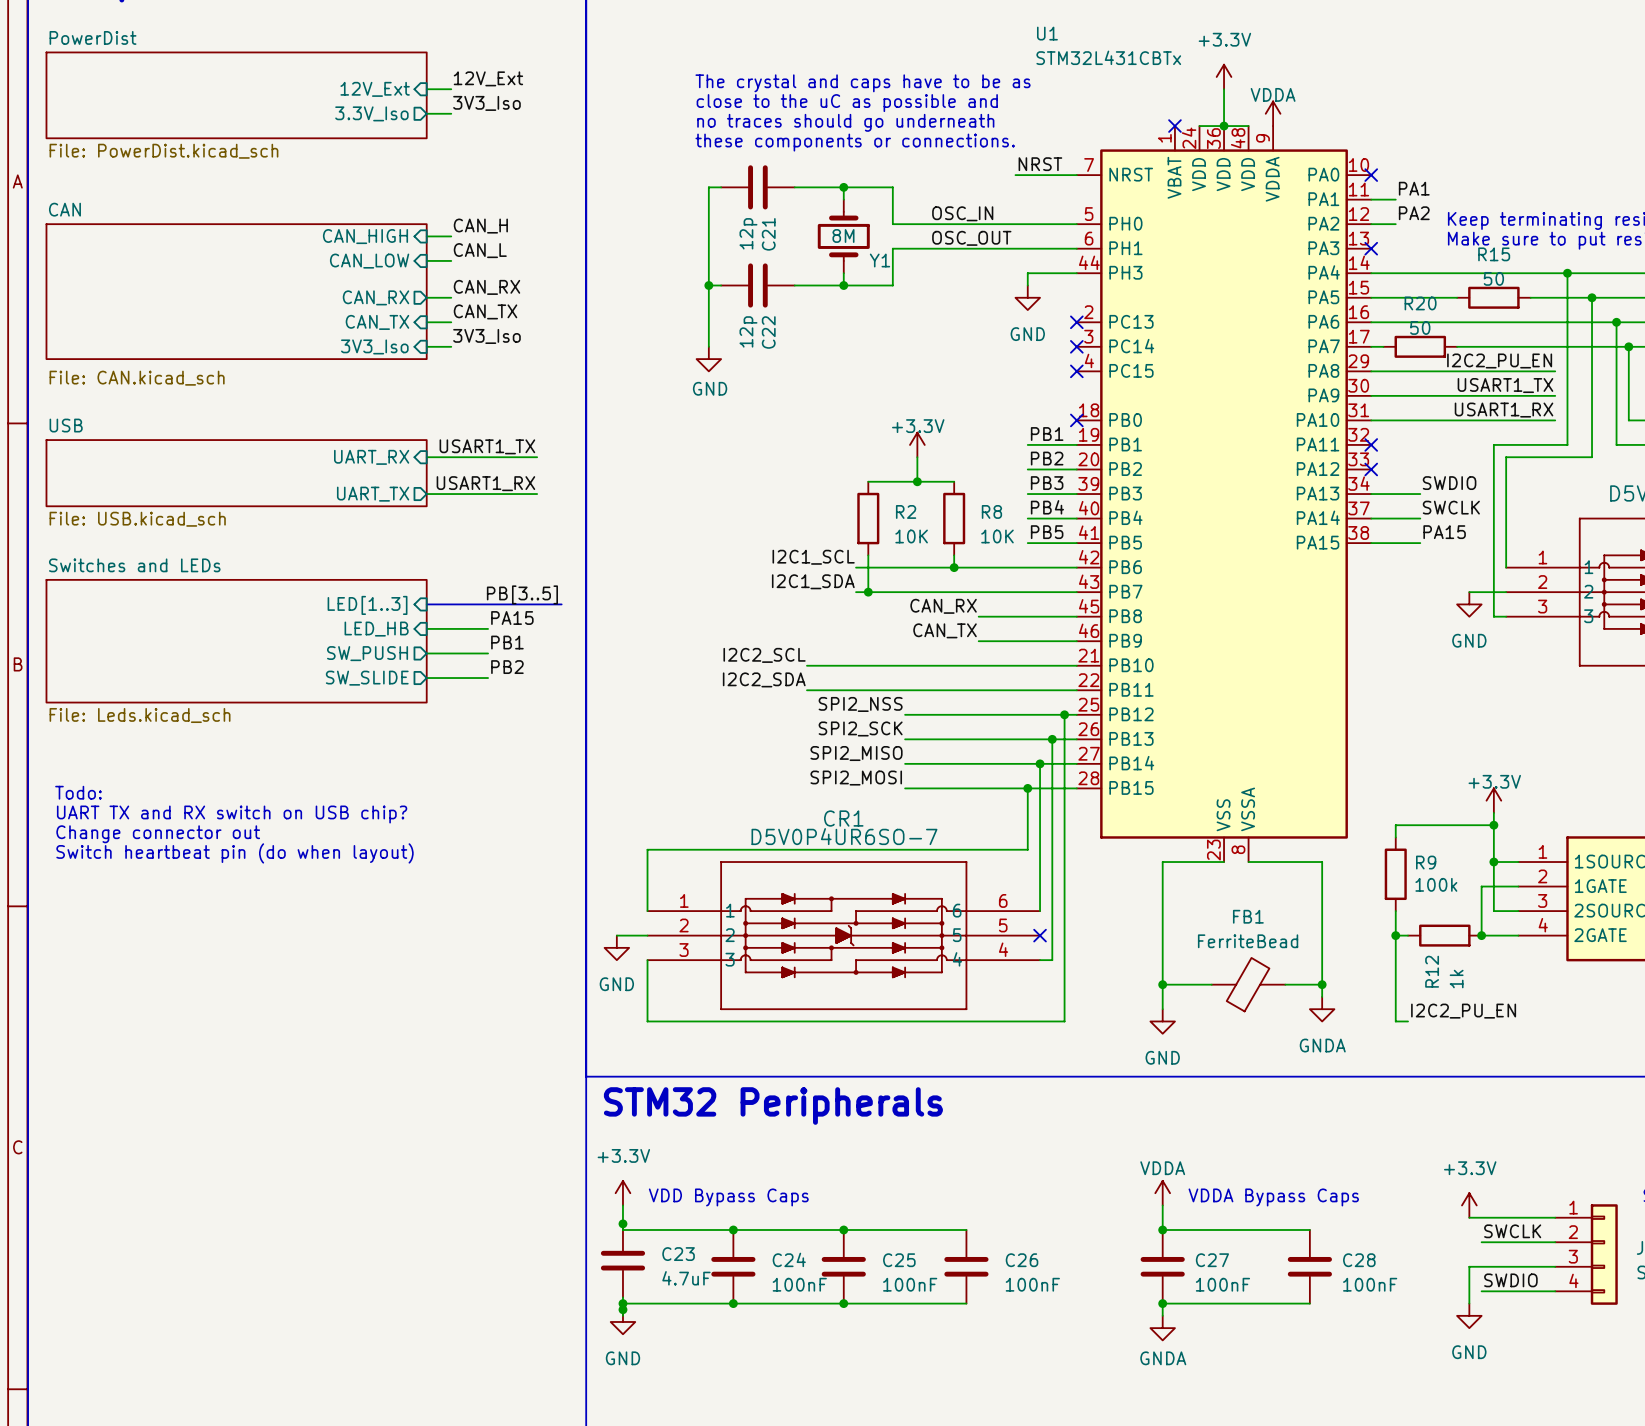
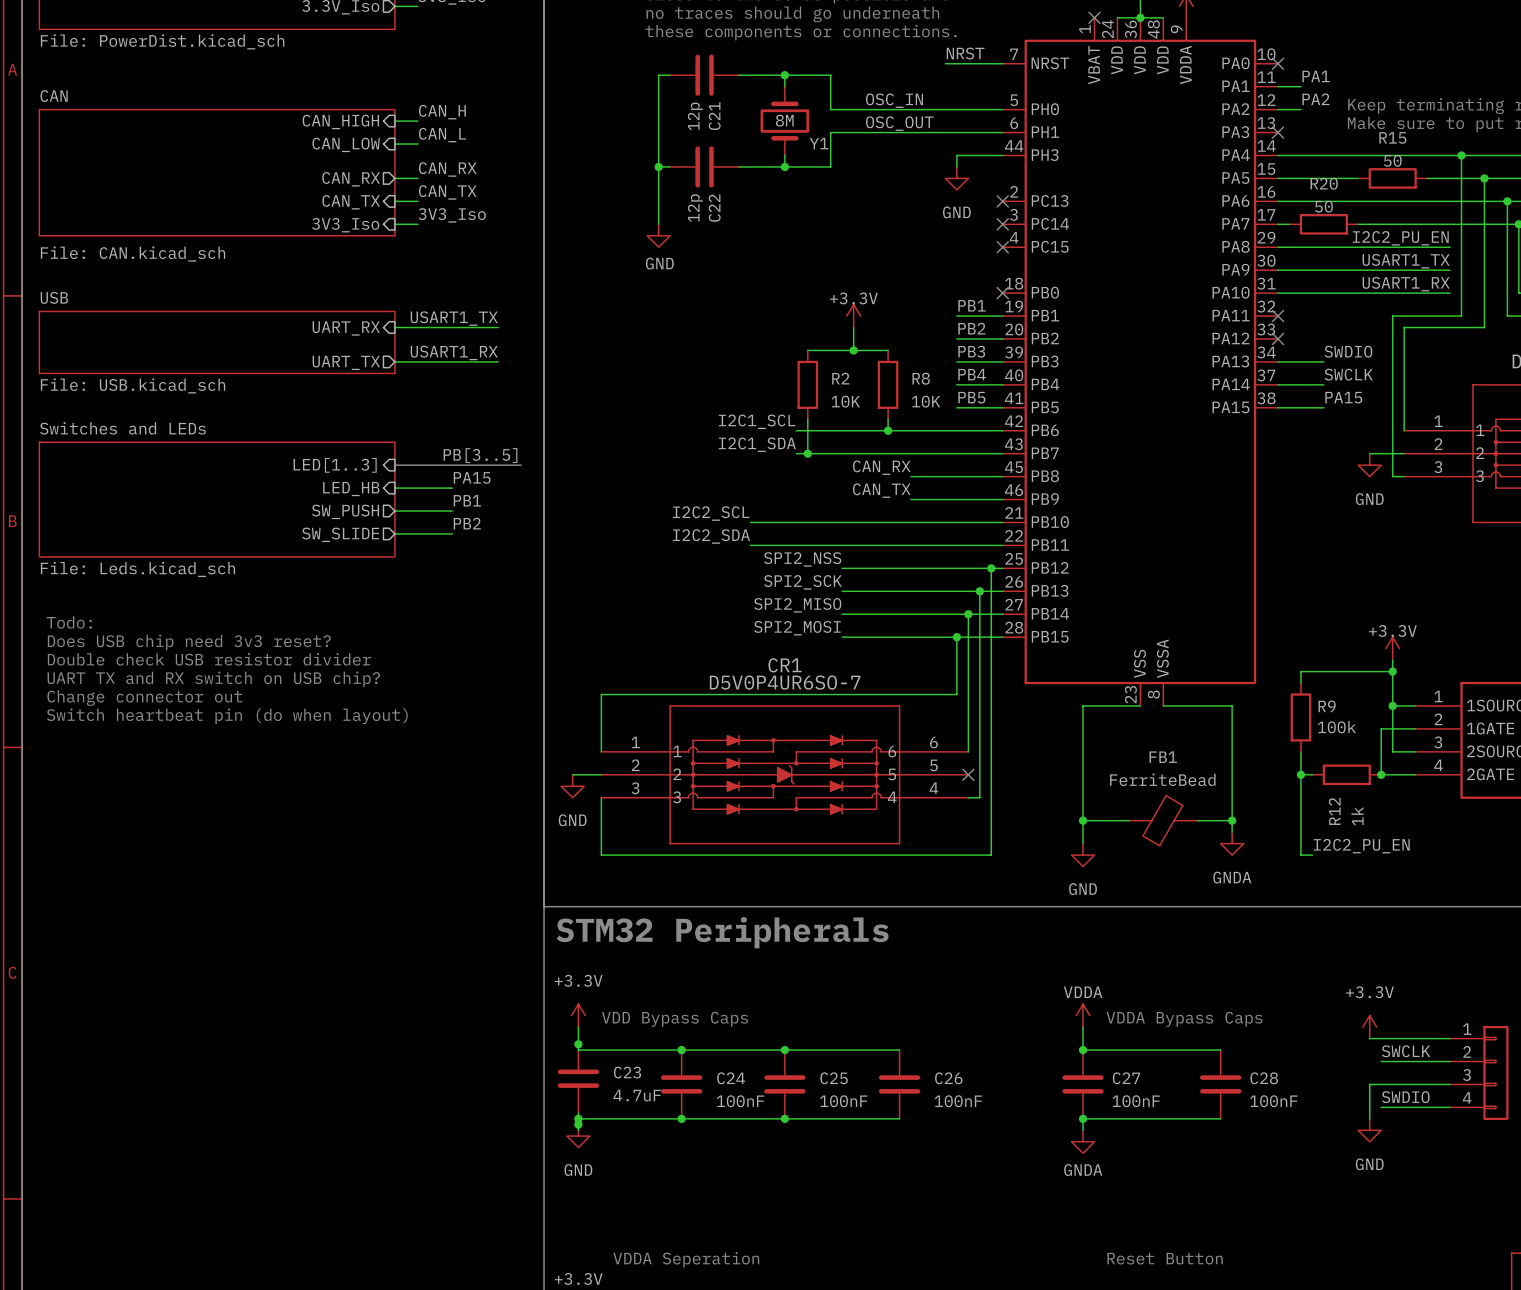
text: none -> Todo: (69, 622)
text: Todo: (78, 792) -> Does USB chip need 3v3 reset? (189, 642)
text: UART TX and RX switch on USB chip? (232, 814) -> Double check USB resistor divider (209, 659)
text: Change connector out (158, 834) -> UART TX and RX switch on USB chip? (213, 679)
text: Switch heartbeat pin (do when layout) (235, 853) -> Change connector out (144, 697)
text: none -> Switch heartbeat pin (do when layout) (227, 716)

